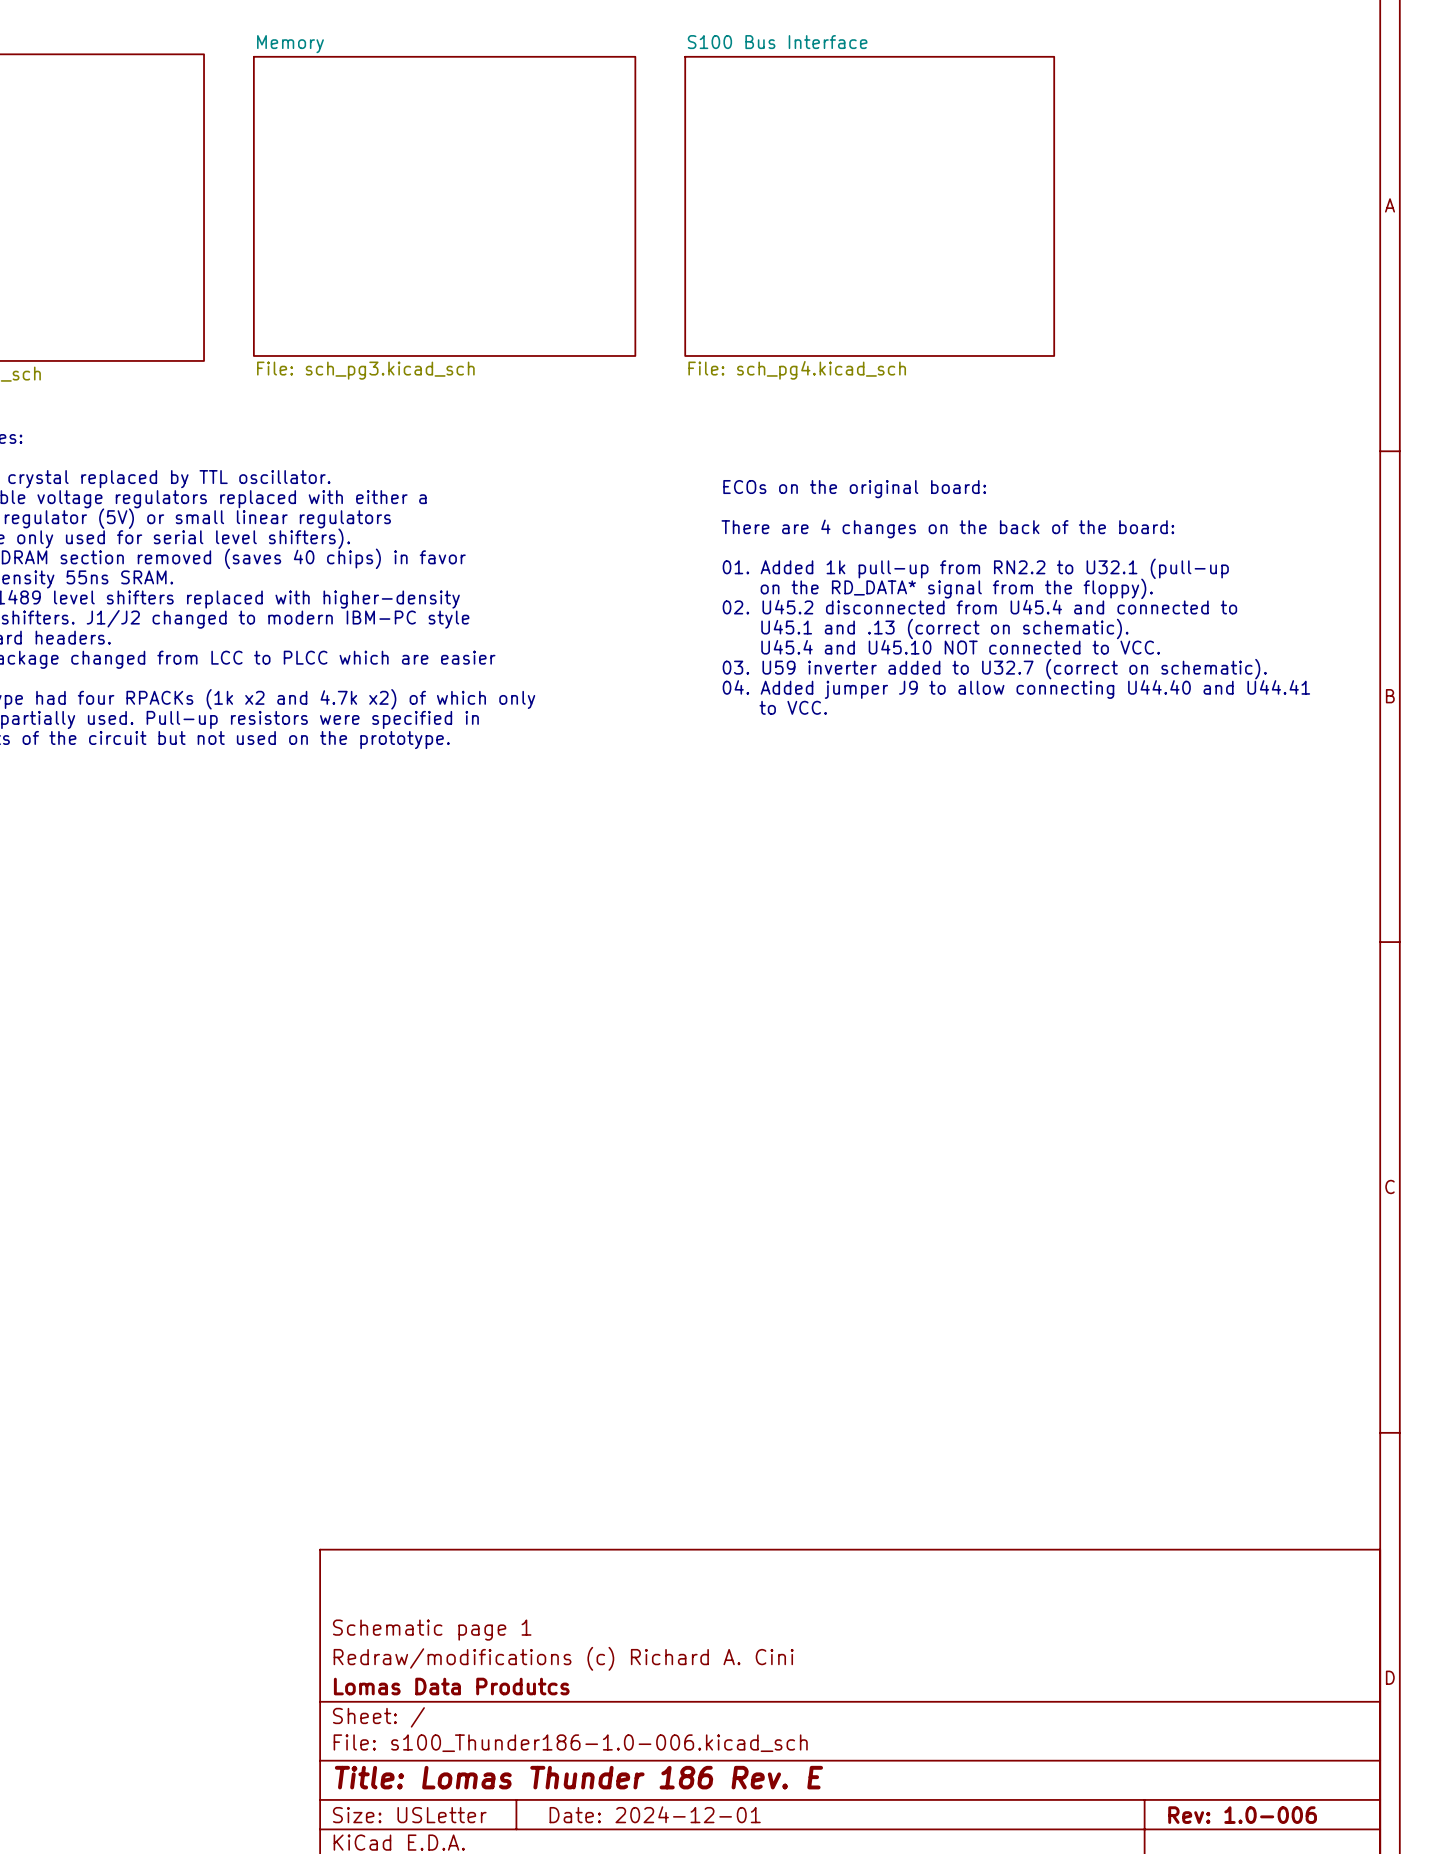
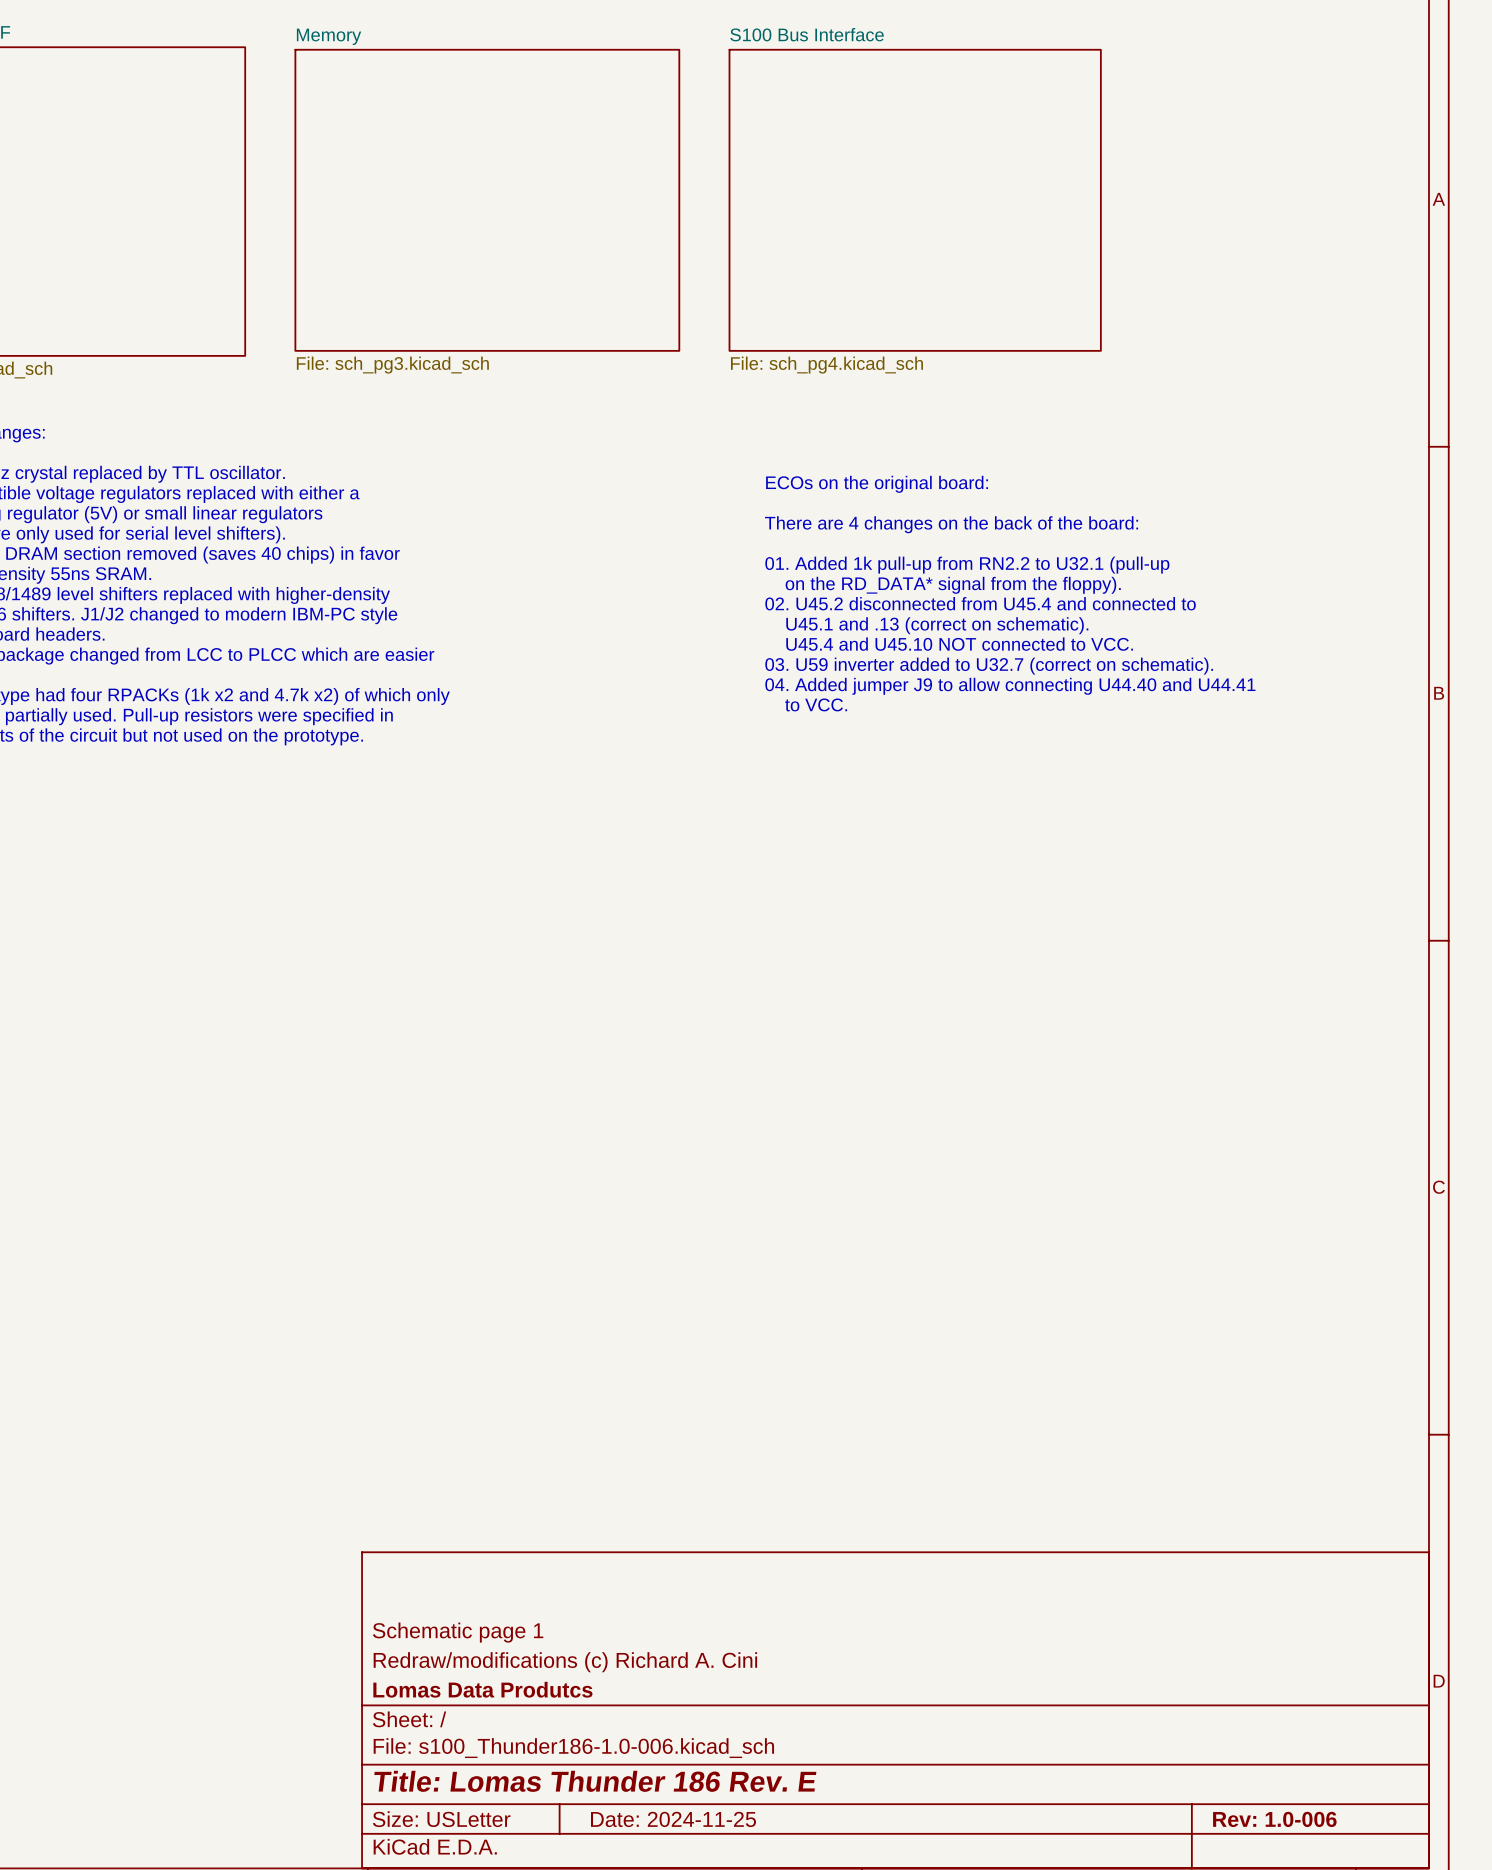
title block: Date: 2024-12-01 (655, 1814) -> Date: 2024-11-25 (673, 1819)

